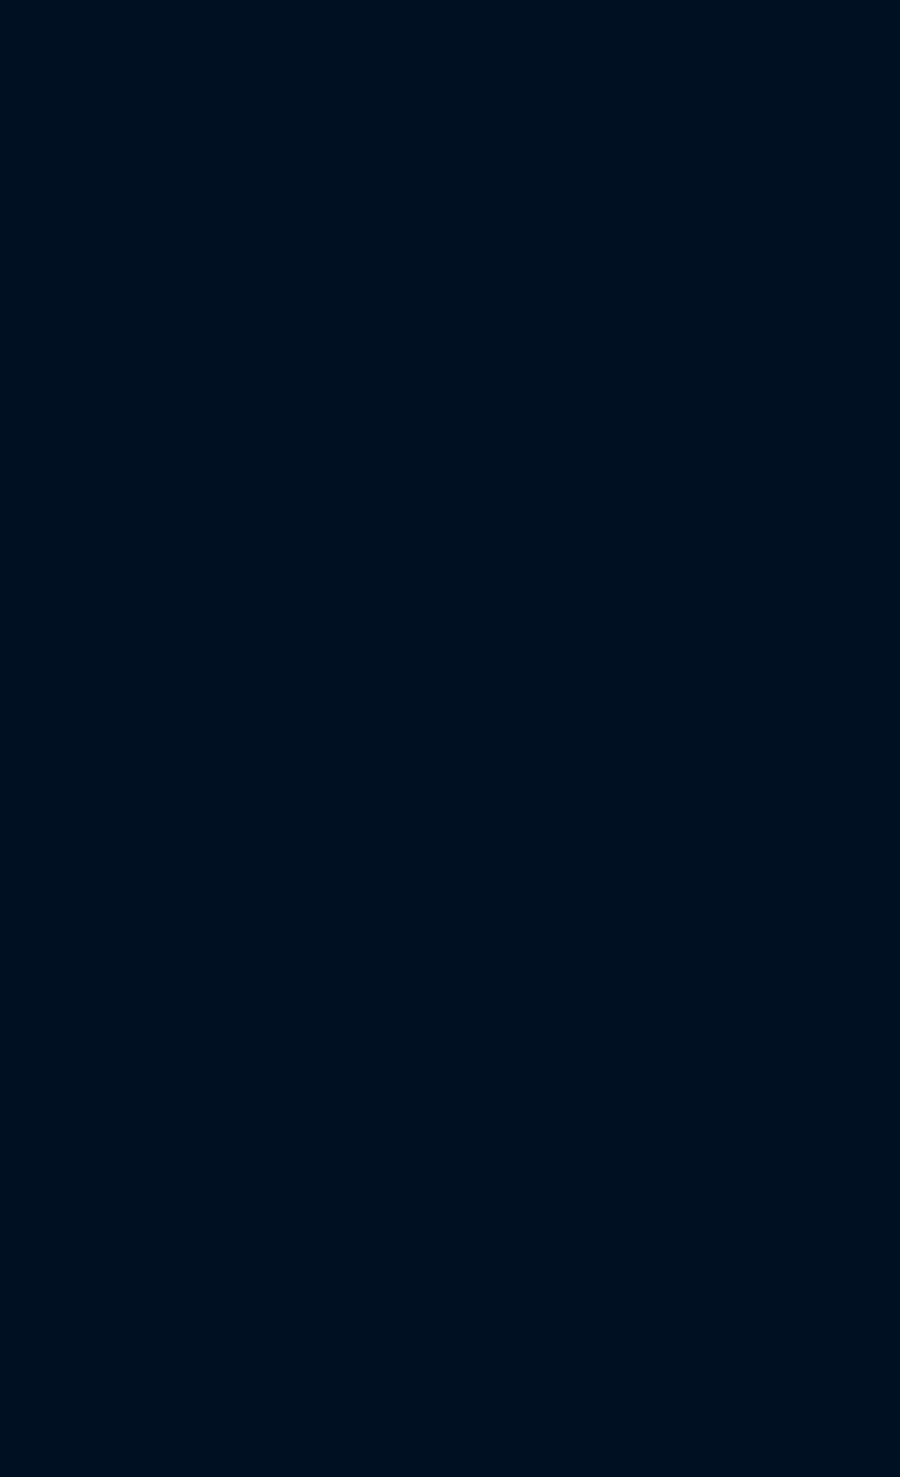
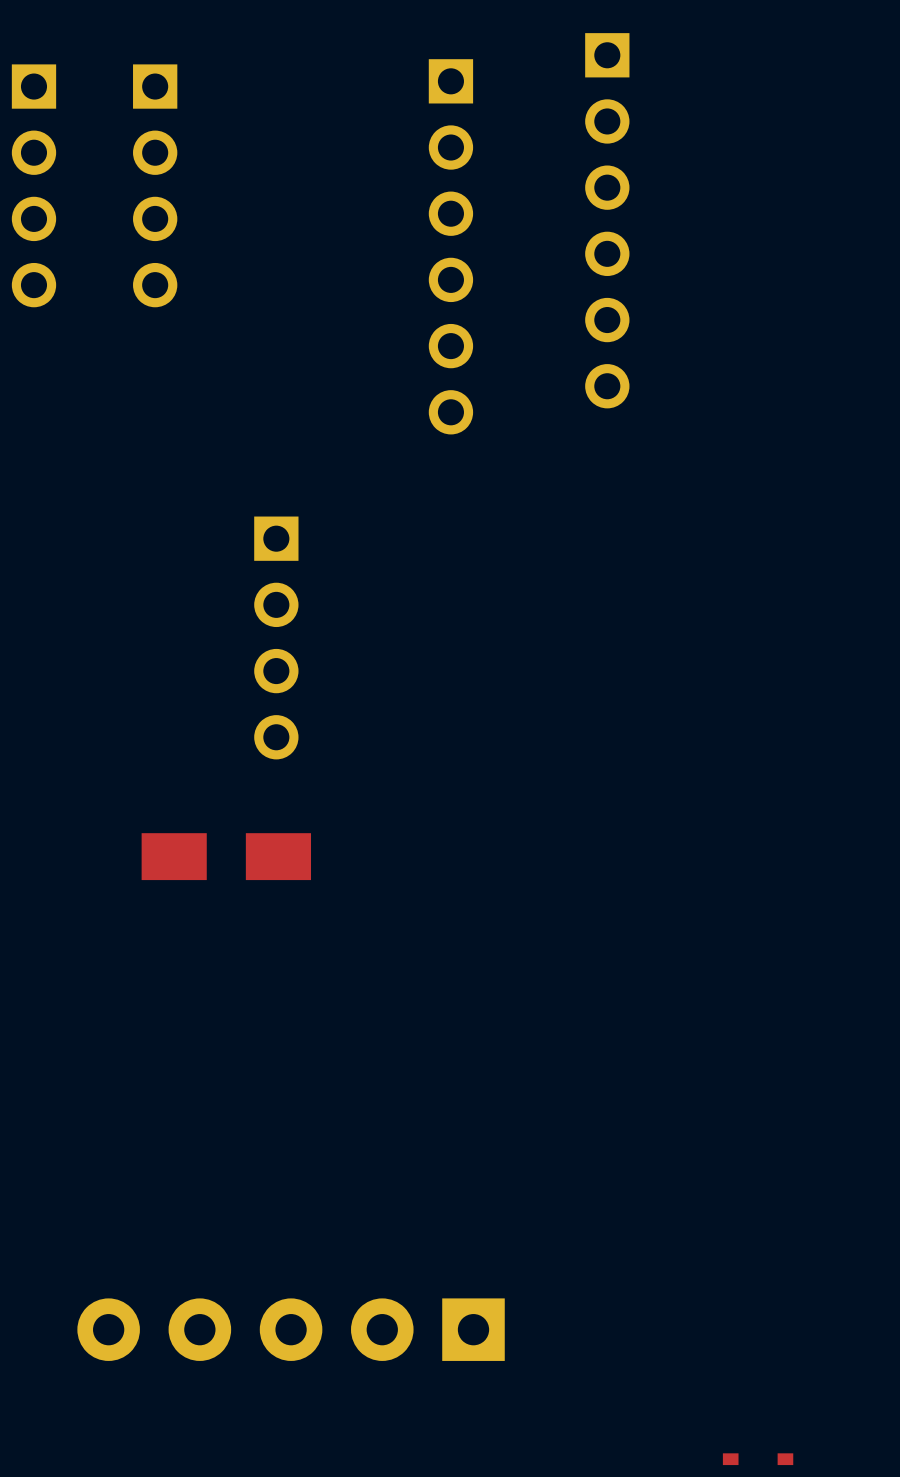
part: none -> (33, 185)
part: none -> (155, 185)
part: none -> (607, 220)
part: none -> (450, 246)
part: none -> (276, 637)
part: none -> (226, 856)
part: none -> (291, 1329)
part: none -> (758, 1459)

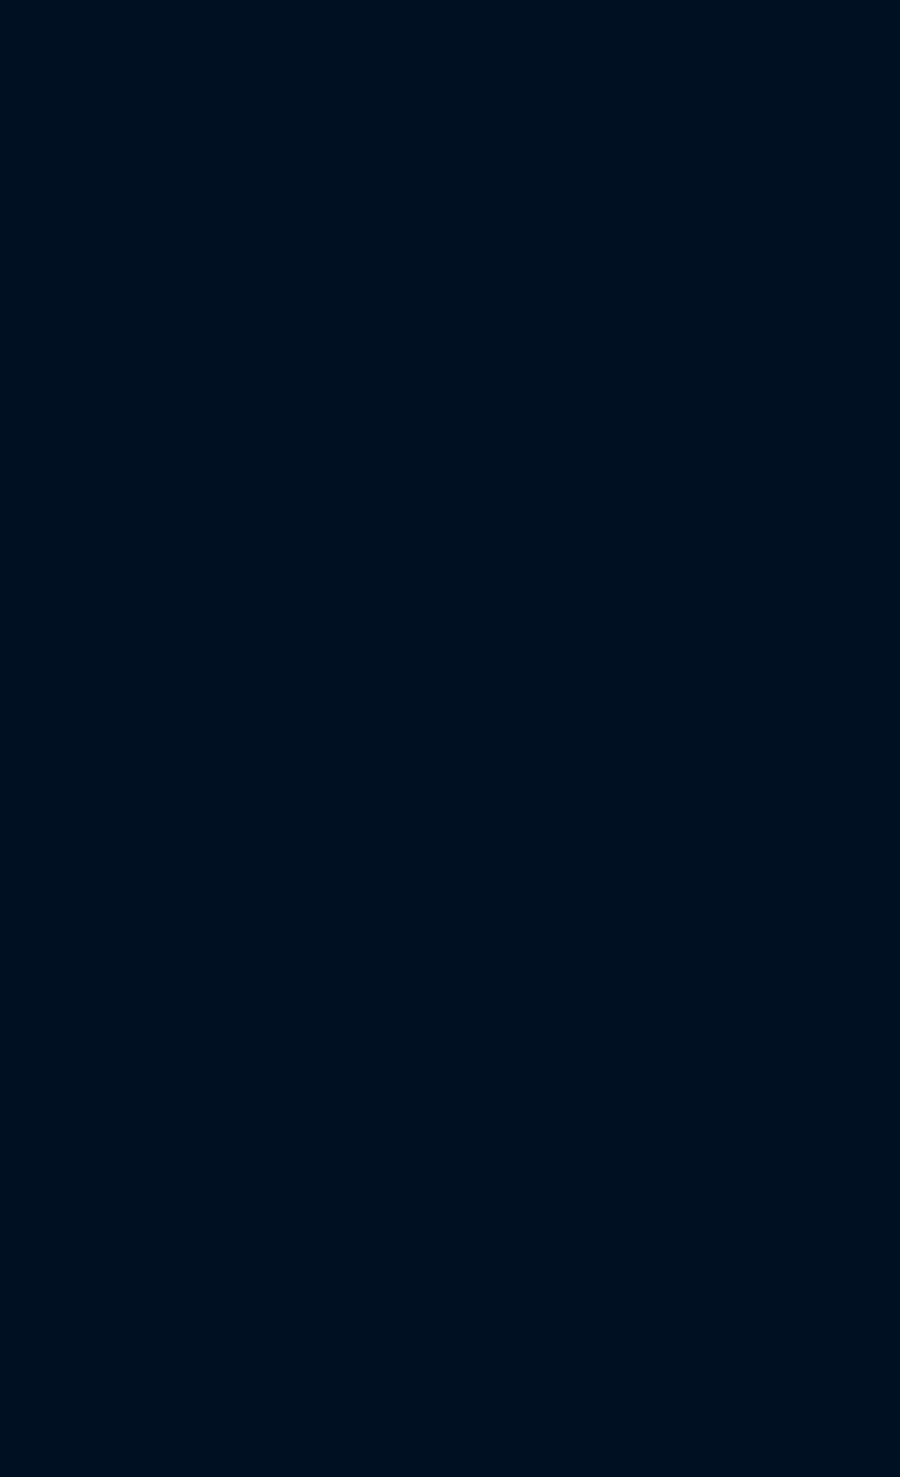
part: (33, 185) -> none
part: (155, 185) -> none
part: (607, 220) -> none
part: (450, 246) -> none
part: (276, 637) -> none
part: (226, 856) -> none
part: (291, 1329) -> none
part: (758, 1459) -> none

